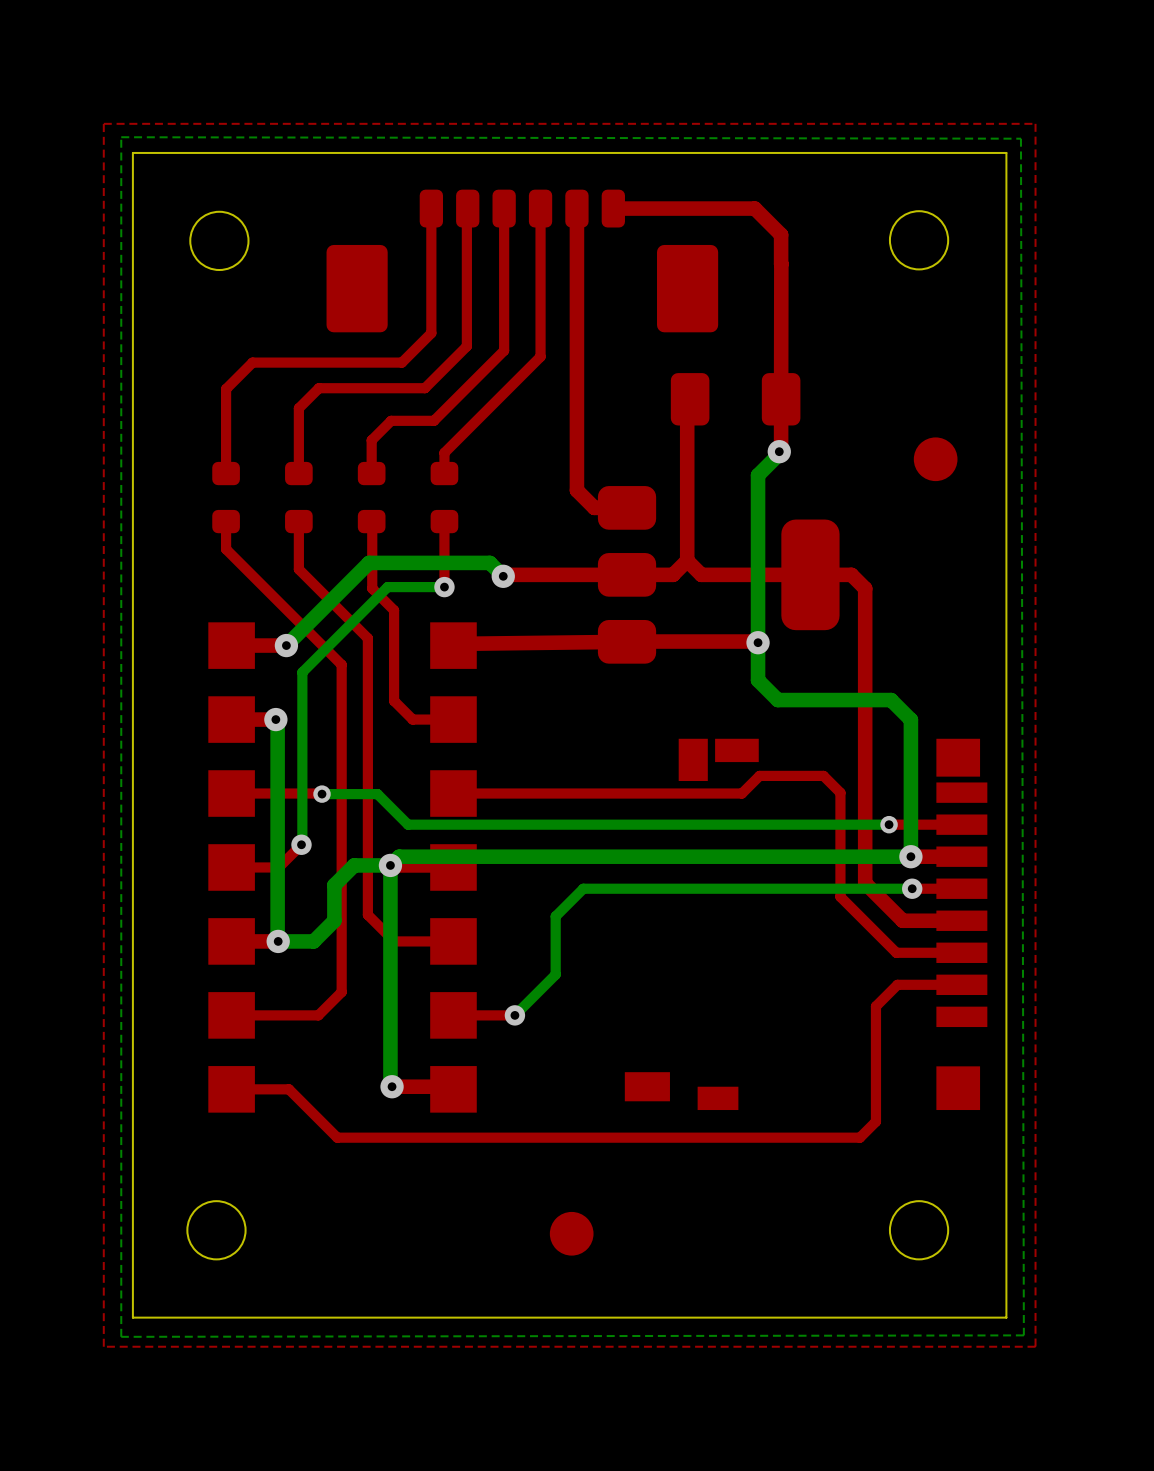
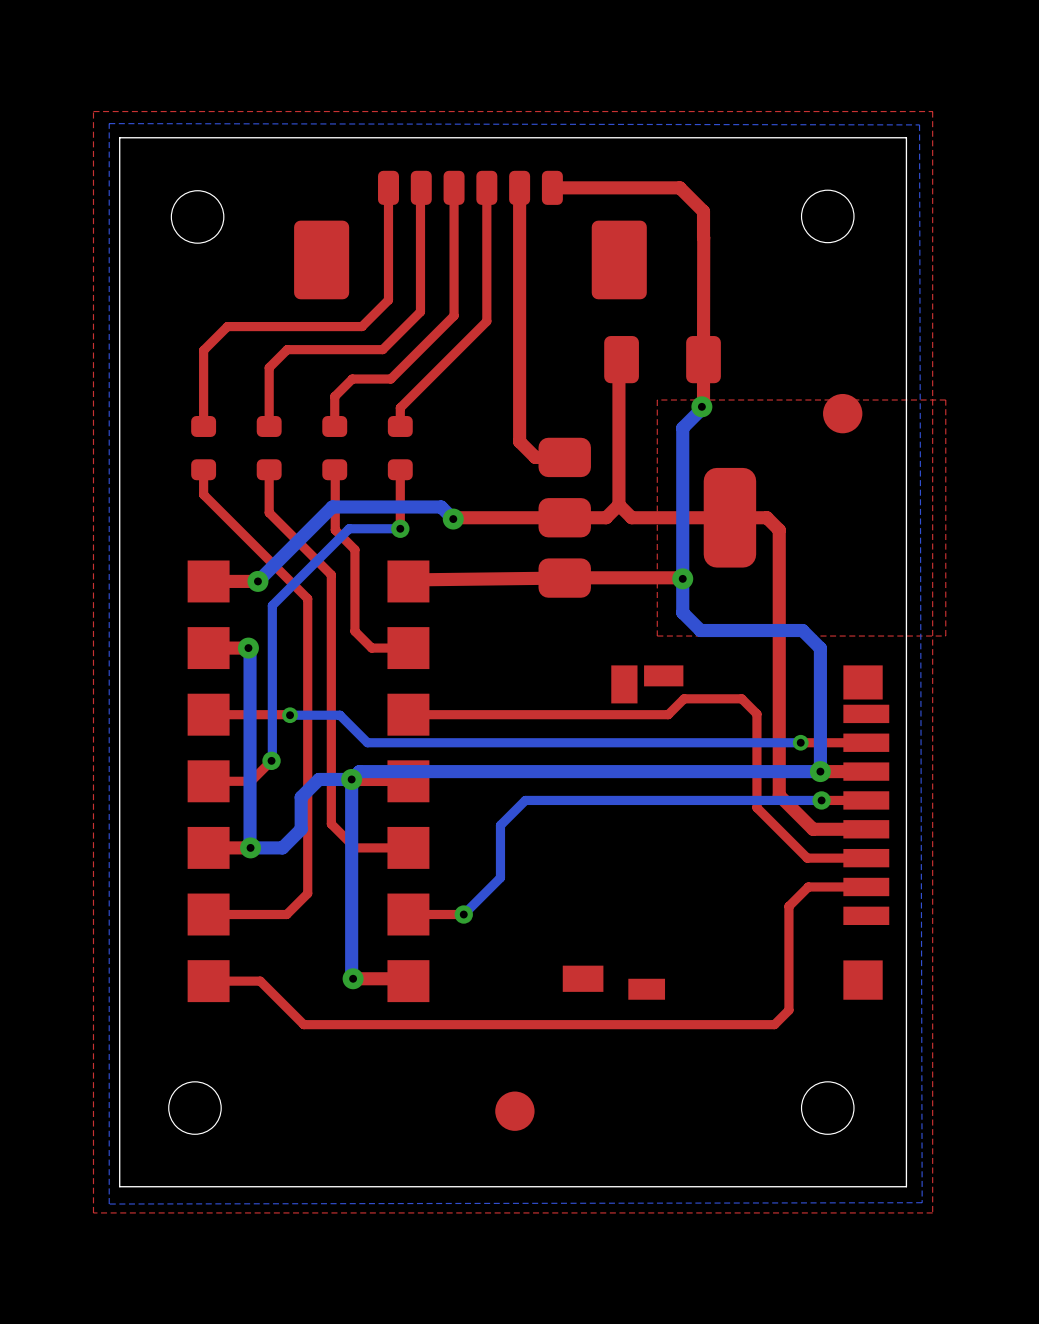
top zone outline: none -> (945, 400) (657, 400) (657, 636) (945, 636) (945, 400)

